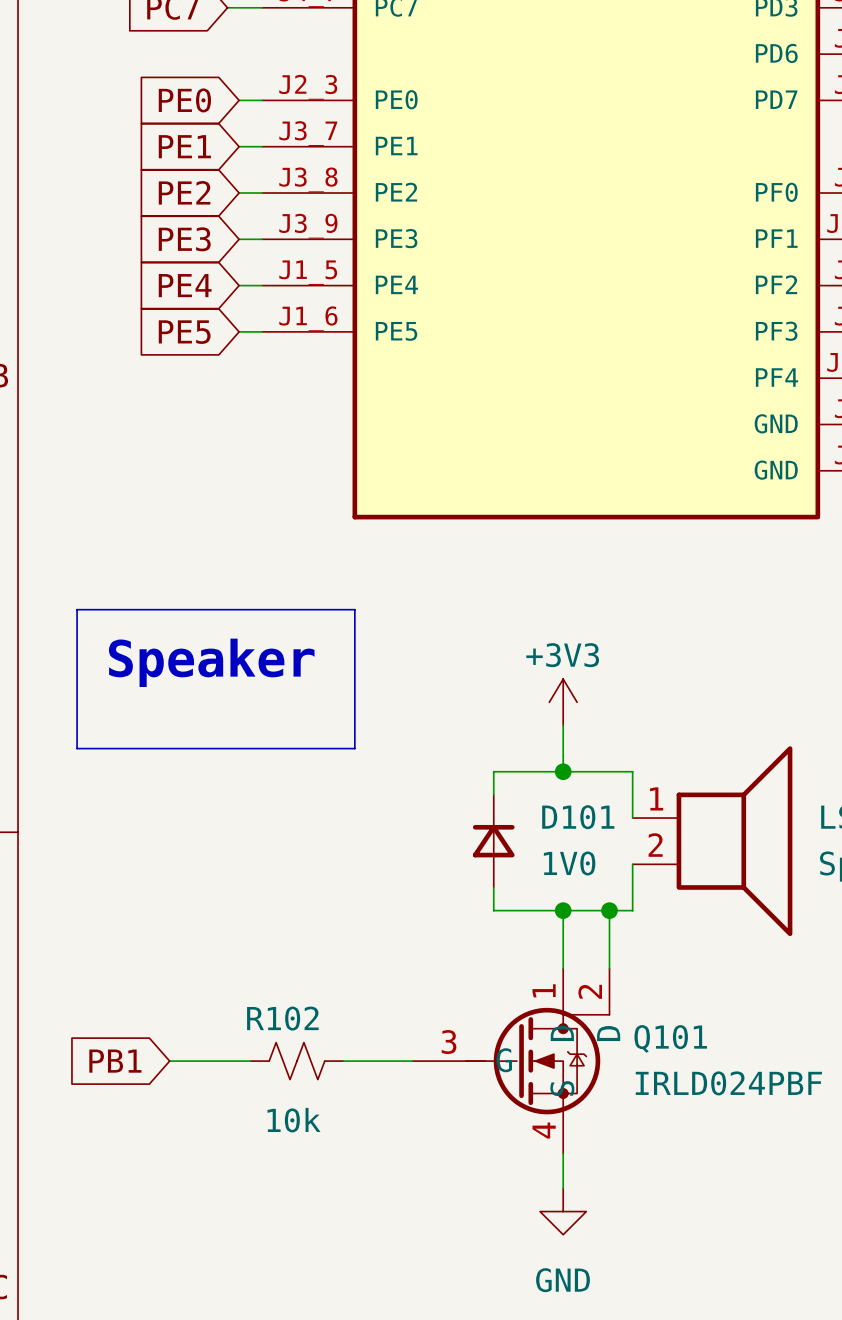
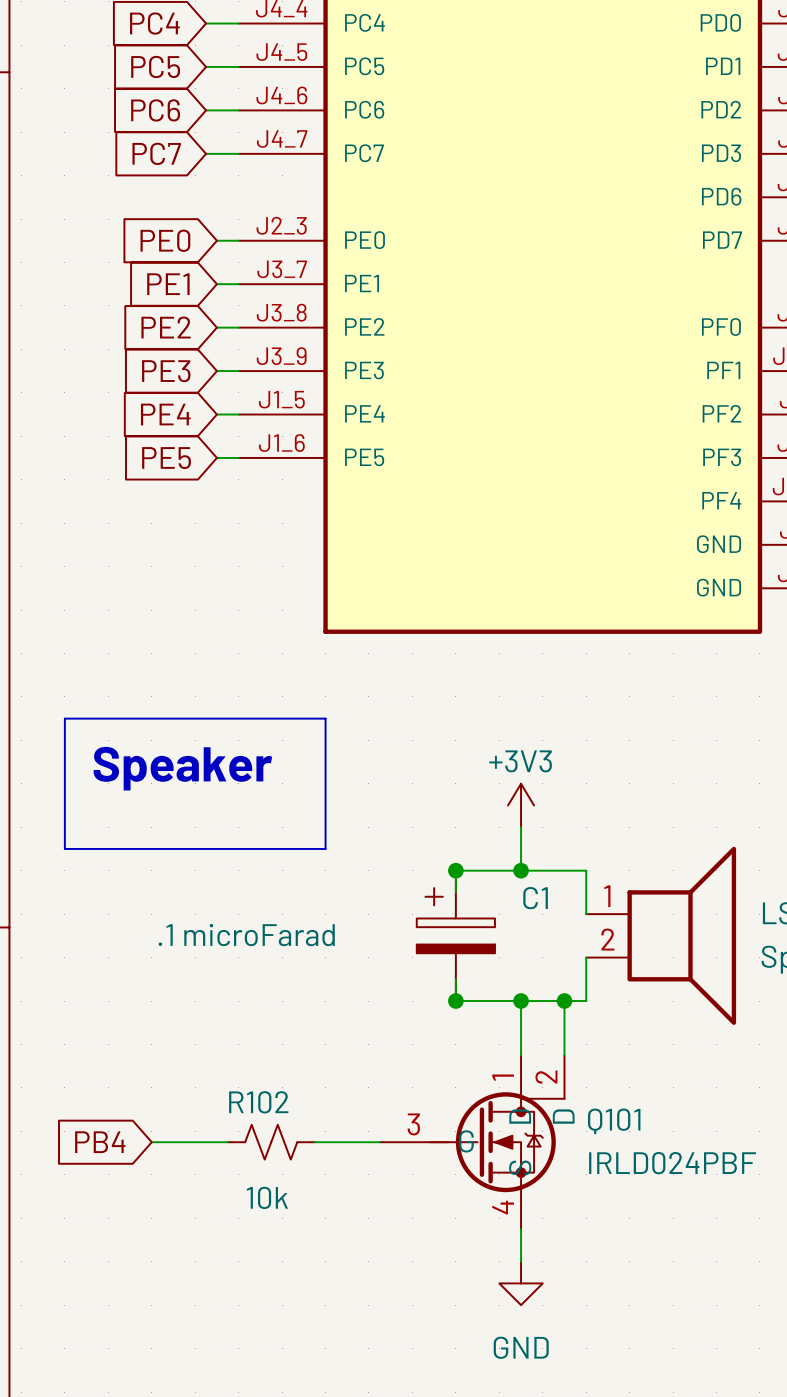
junction: none -> (455, 870)
D101: 1V0 (493, 841) -> none
C1: none -> .1 microFarad (455, 935)
junction: none -> (455, 1001)
global label: PB1 (115, 1061) -> PB4 (100, 1142)

